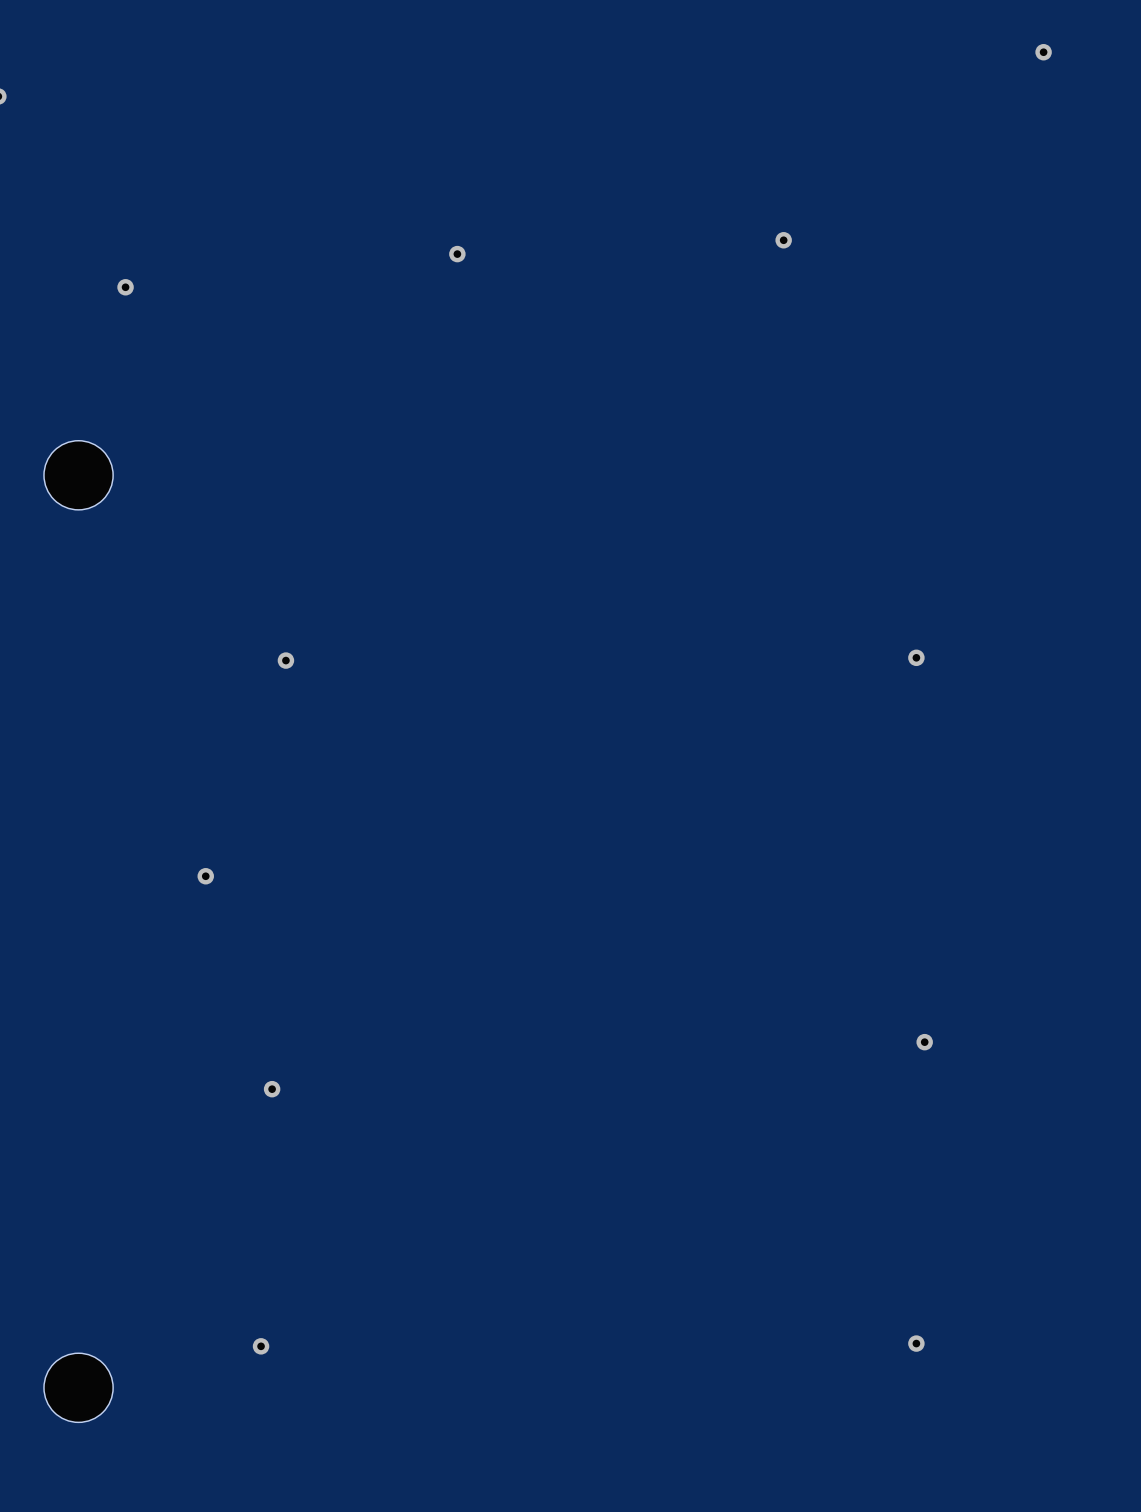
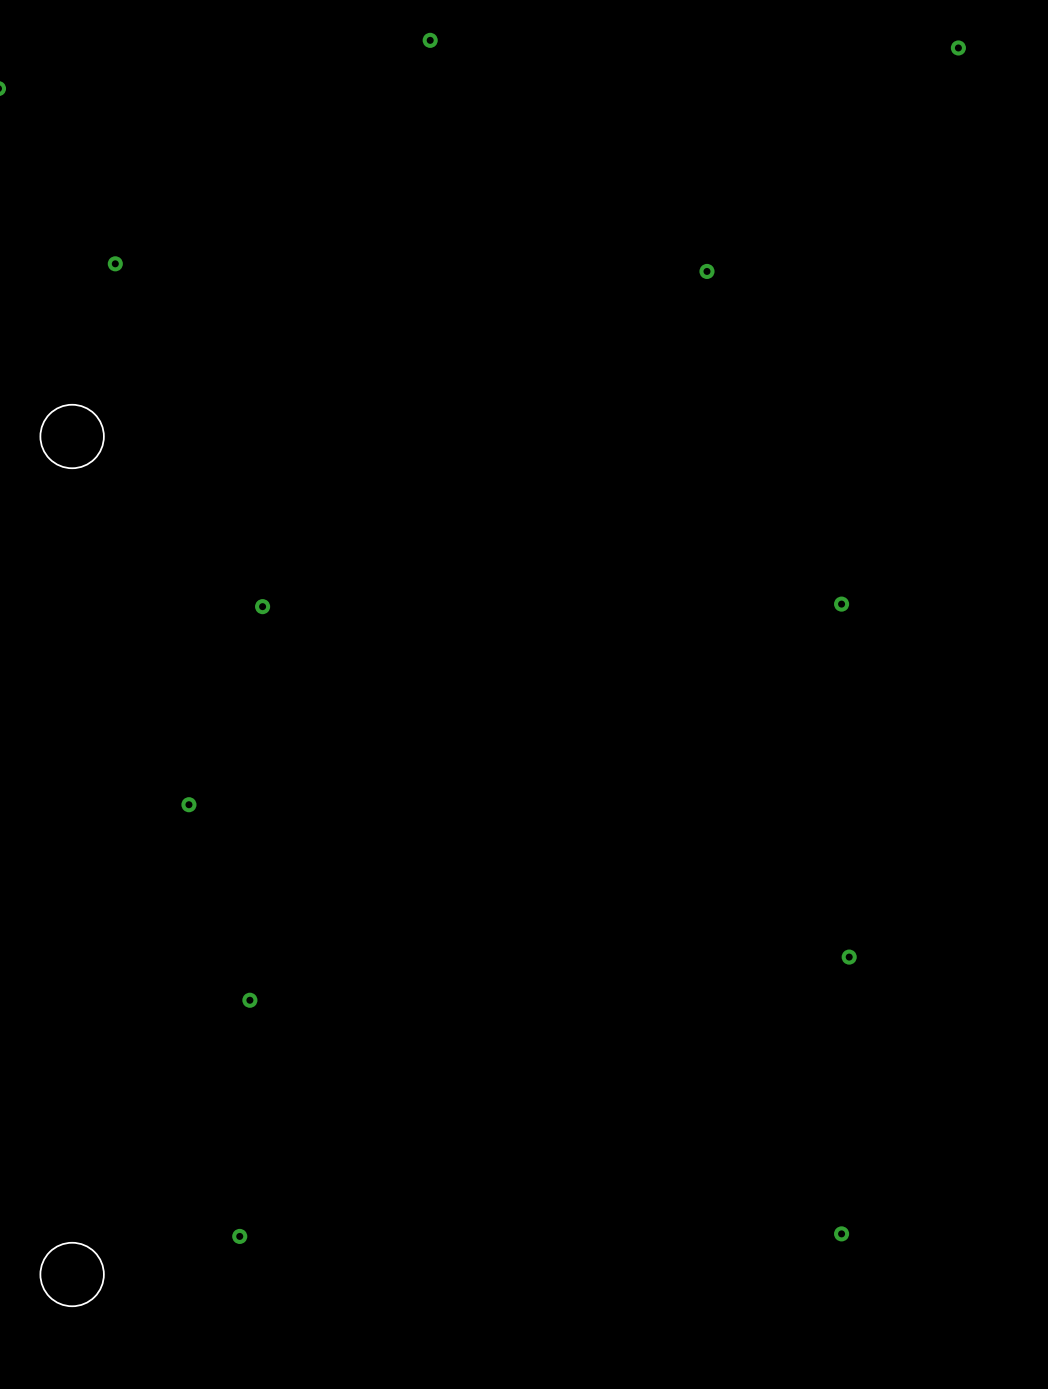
via: none -> (430, 40)
via position: (783, 240) -> (706, 271)
via: (457, 254) -> none

